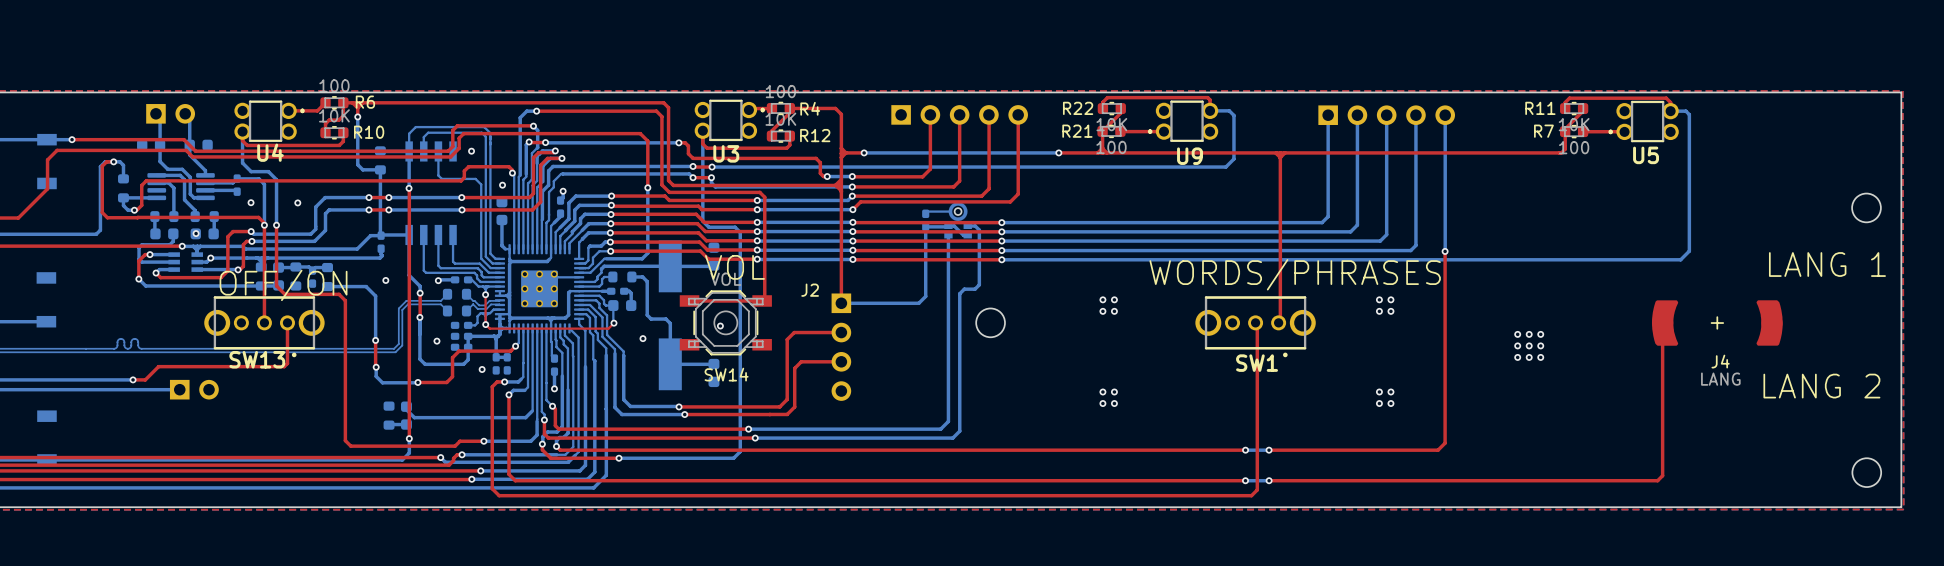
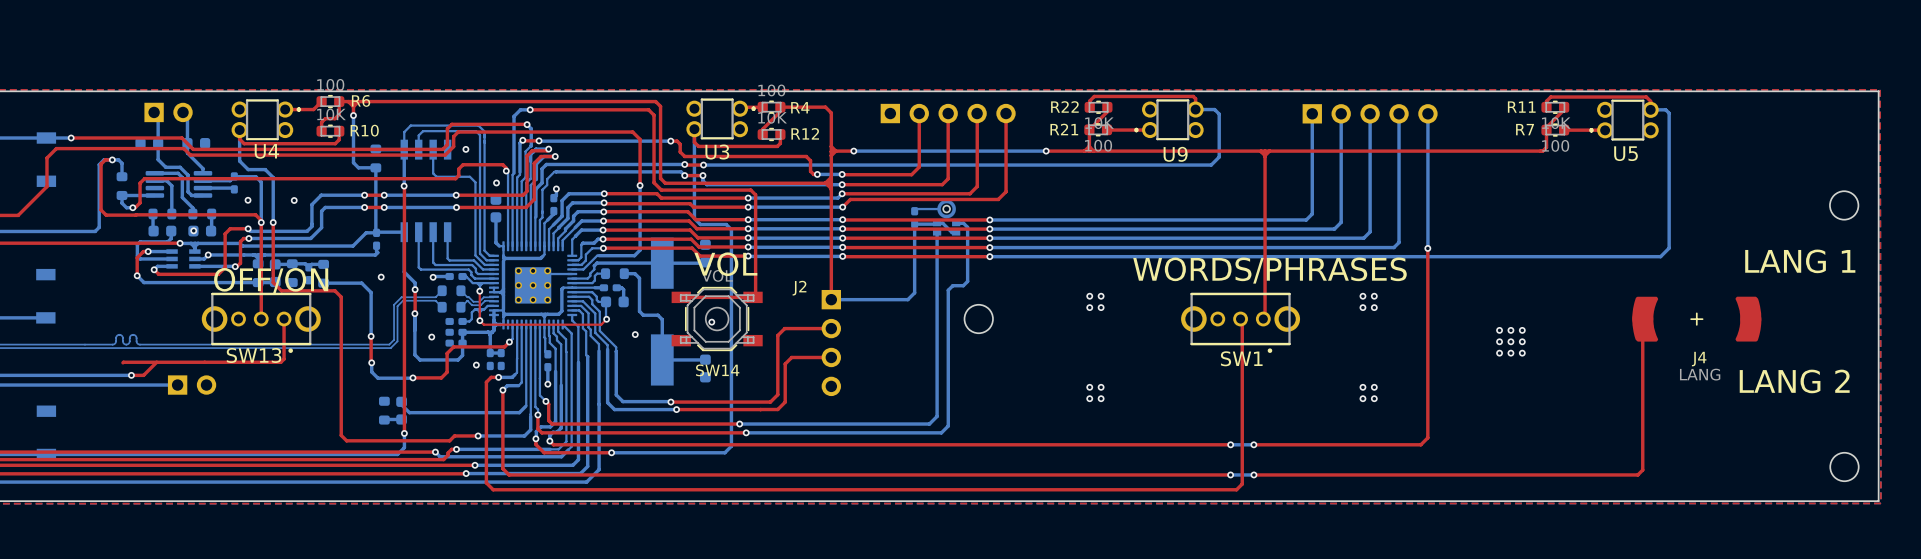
top track: none -> (156, 362) (122, 362)

